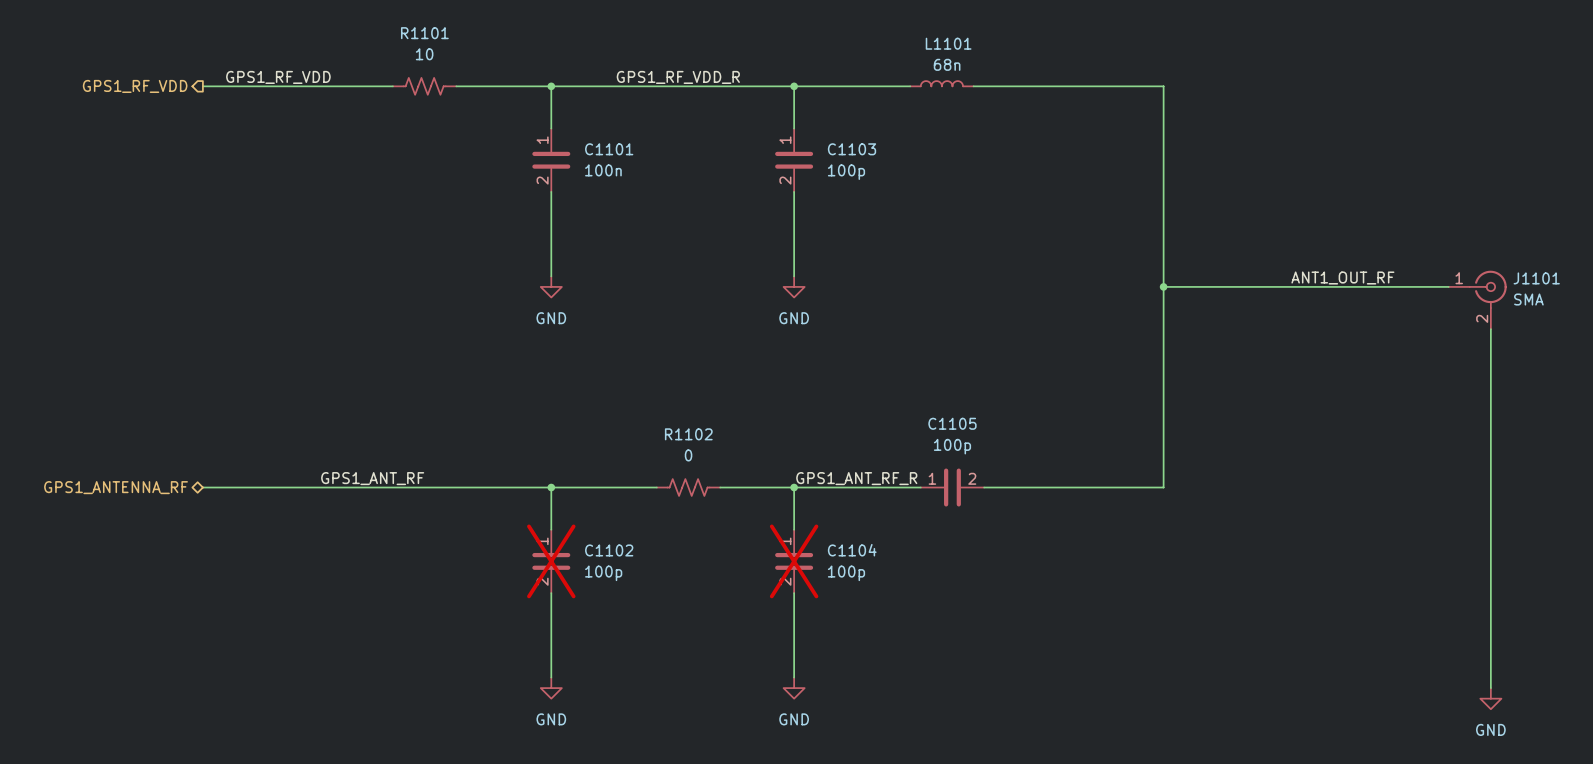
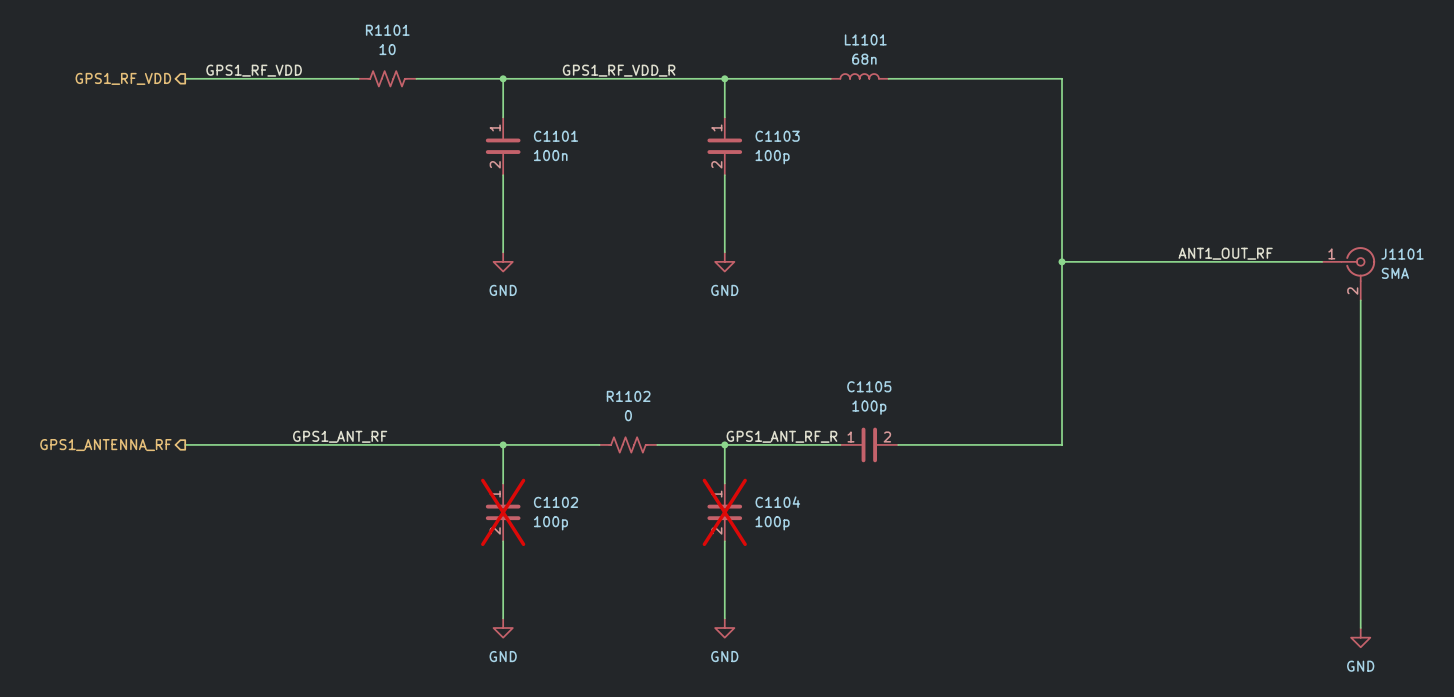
hierarchical label shape: bidirectional (116, 487) -> output (105, 445)

